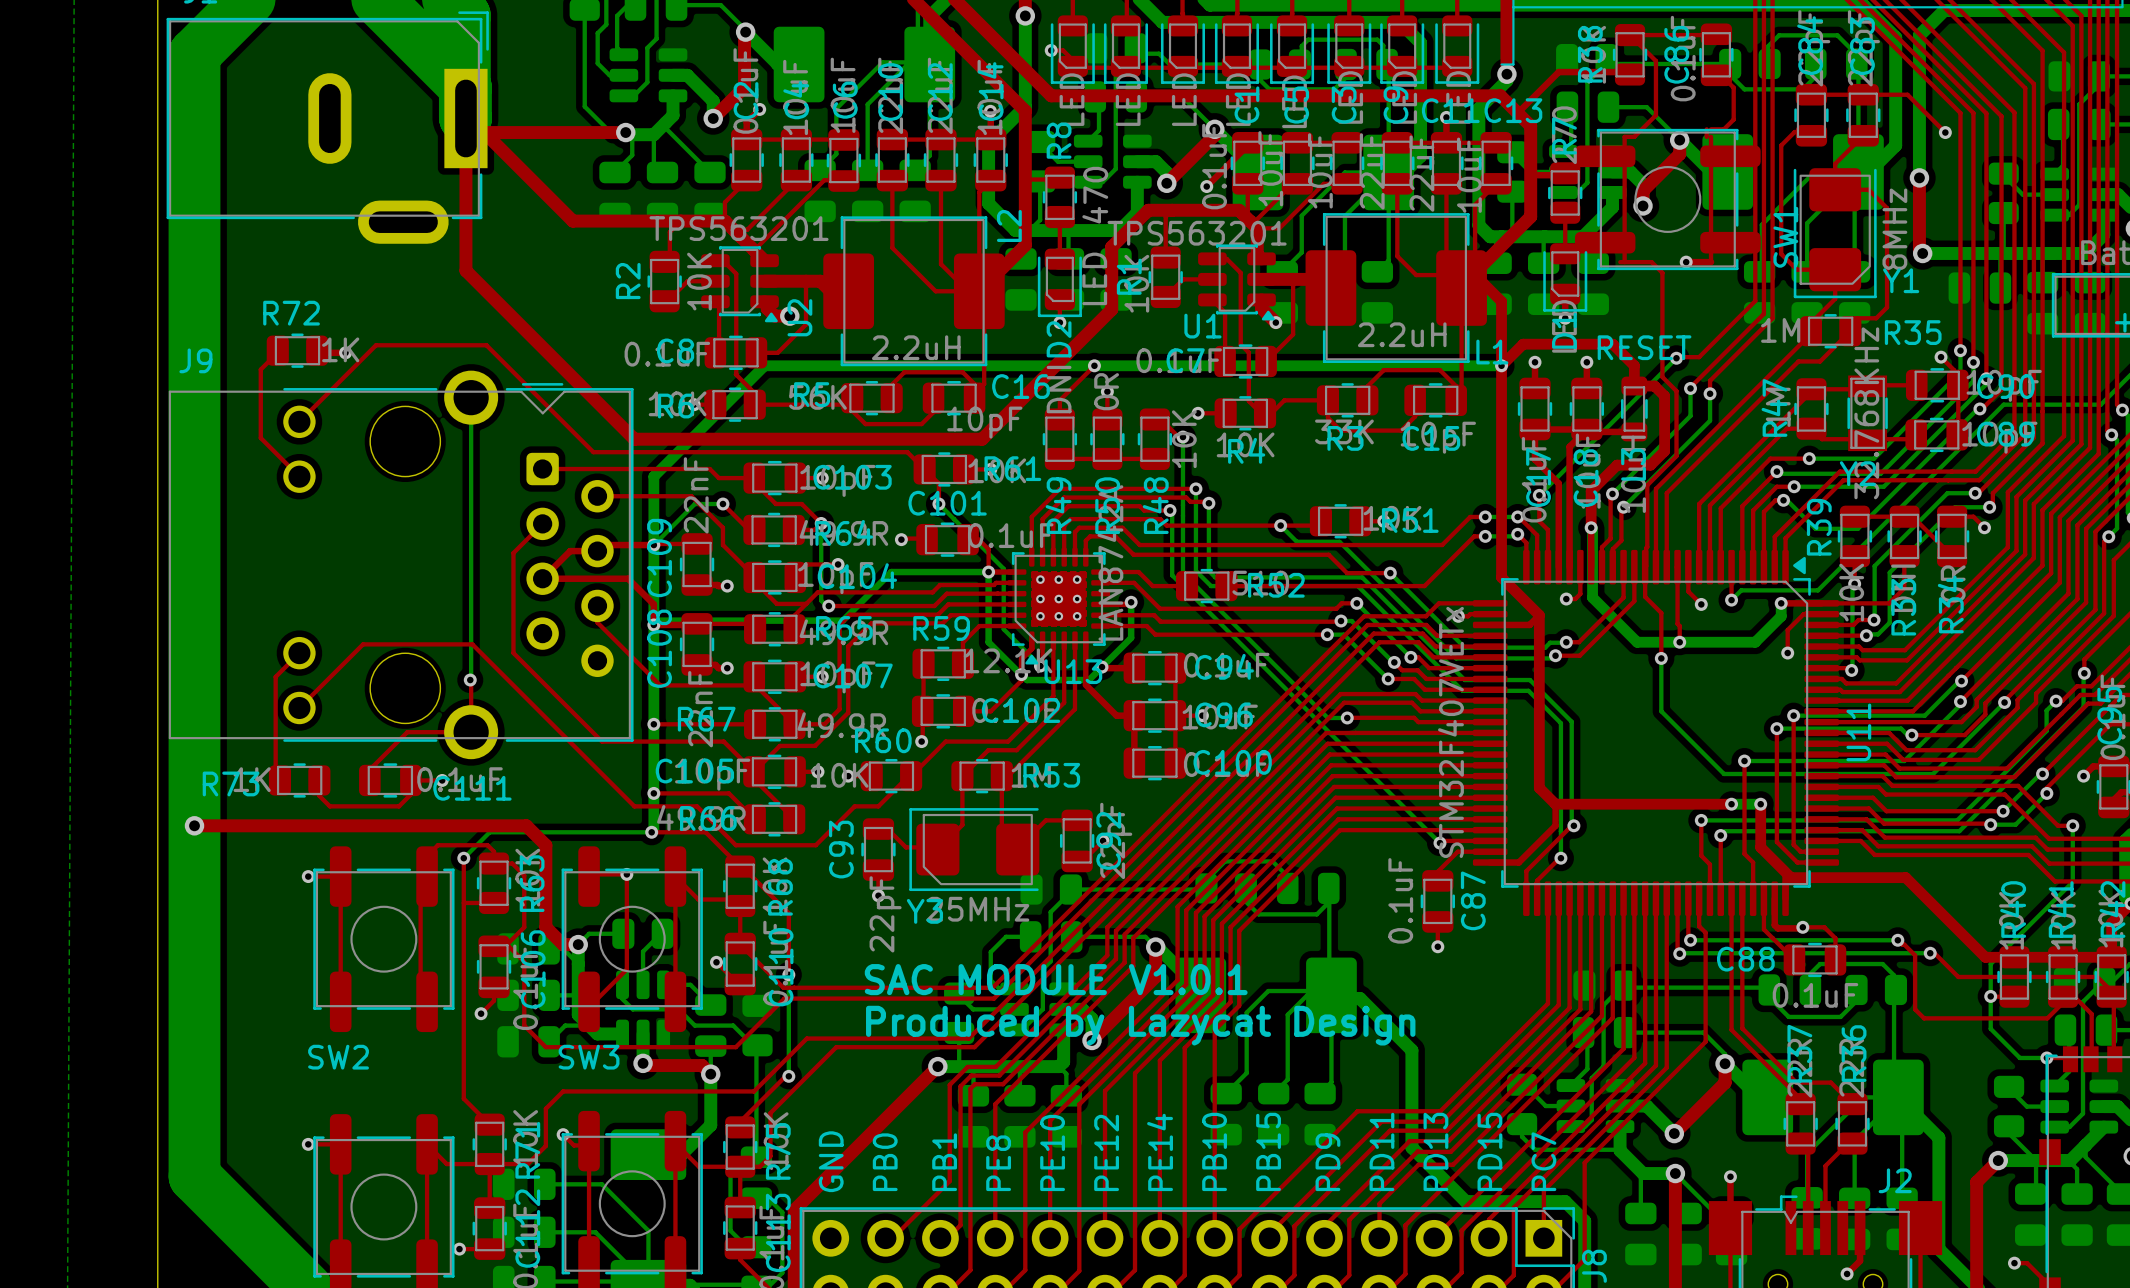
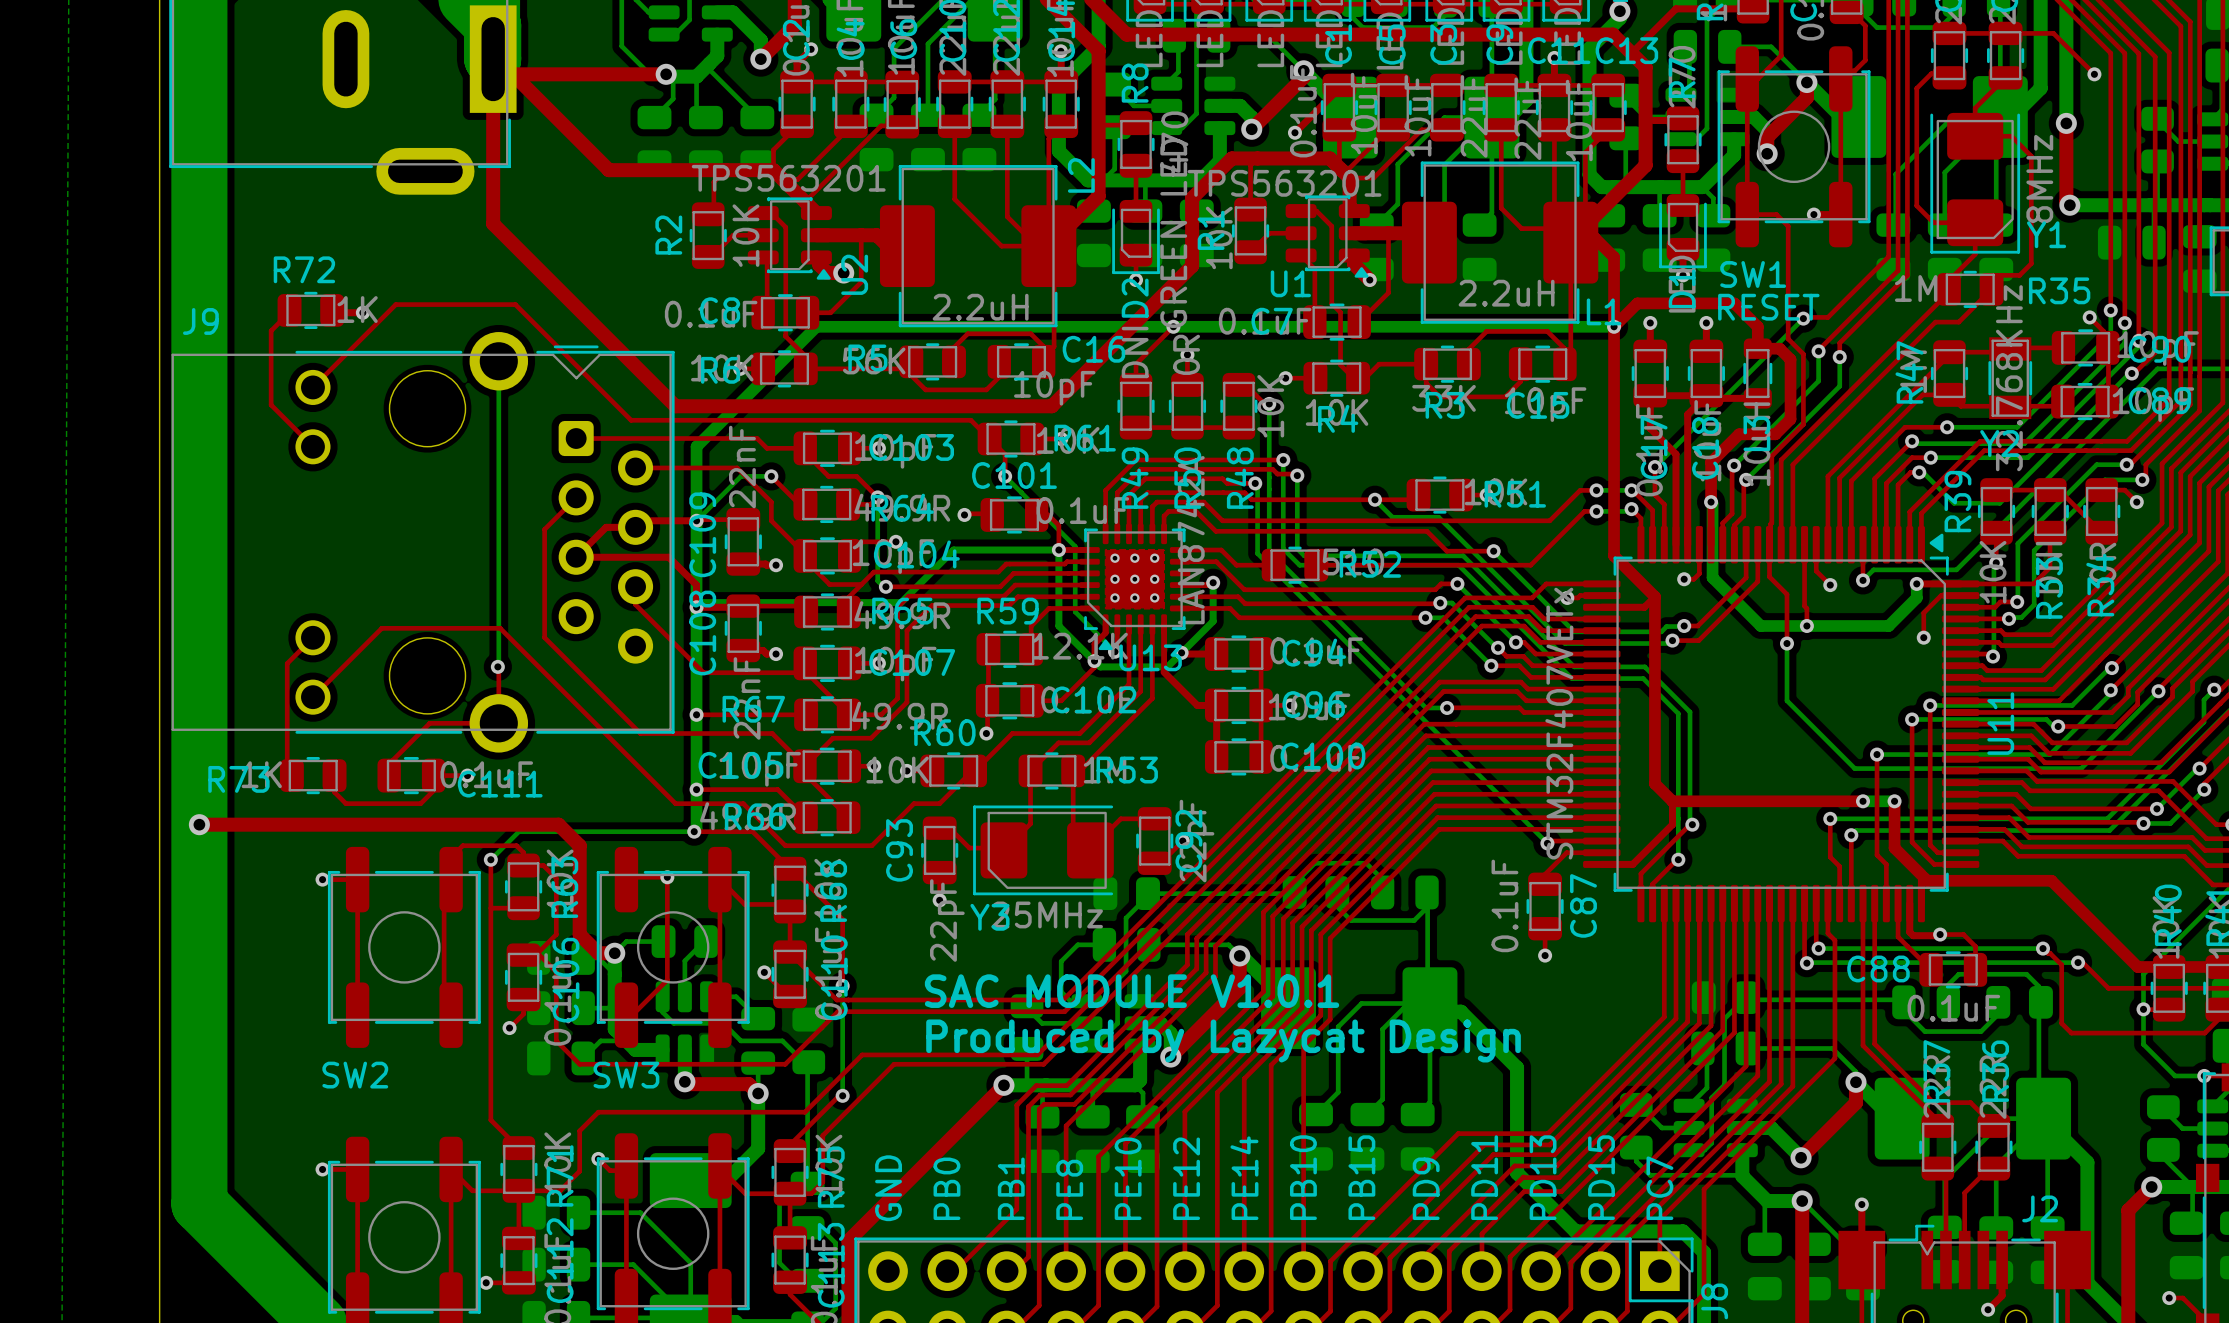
SW1 rotation: 0° (1667, 199) -> 90° clockwise (1794, 146)
D2 value: LED (1094, 278) -> GREEN LED (1173, 233)

